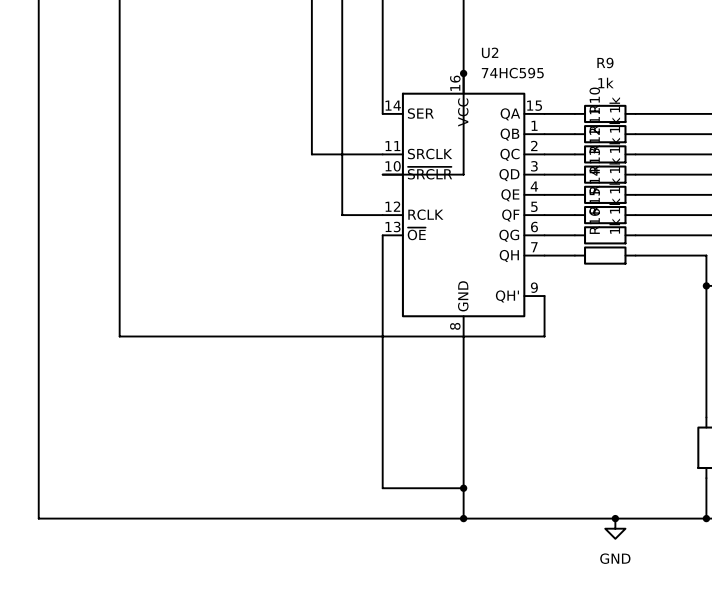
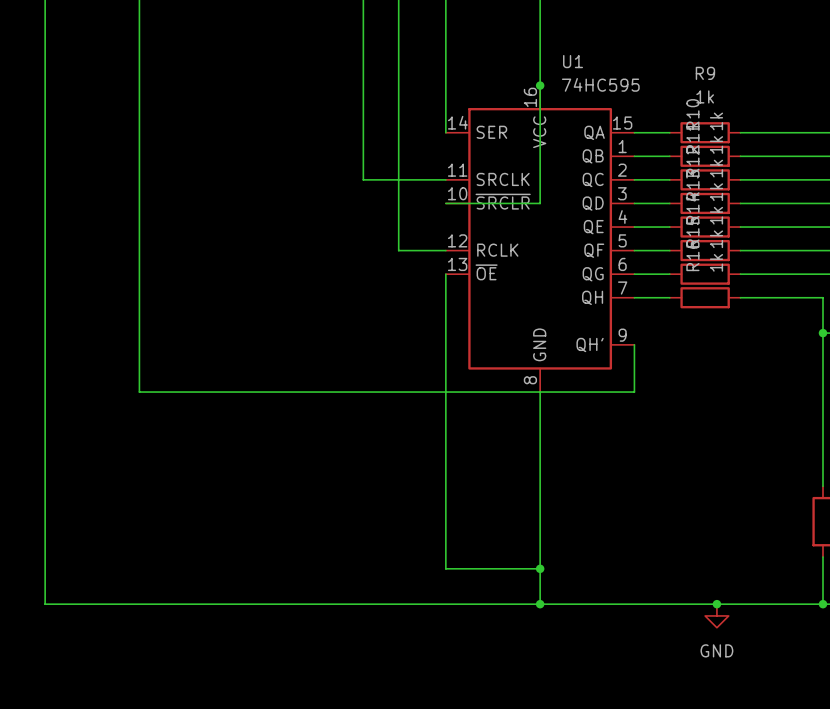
U2 name: U2 (490, 52) -> U1 (573, 61)

